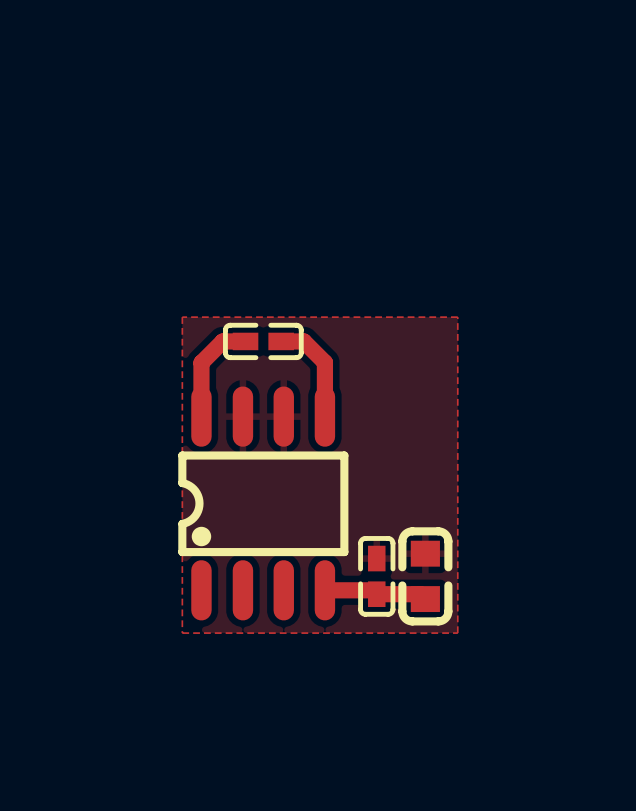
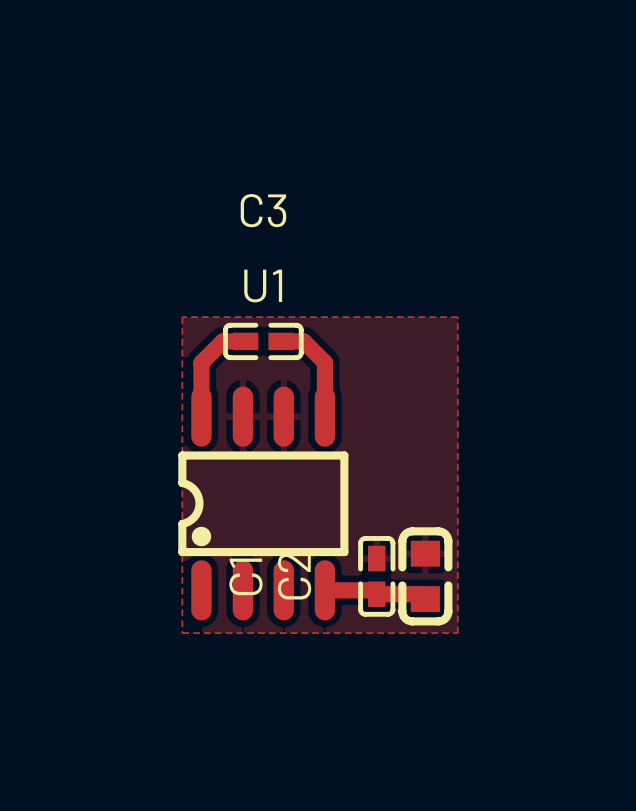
C3 name: none -> C3 (263, 210)
U1 name: none -> U1 (263, 285)
C1 name: none -> C1 (245, 576)
C2 name: none -> C2 (294, 576)

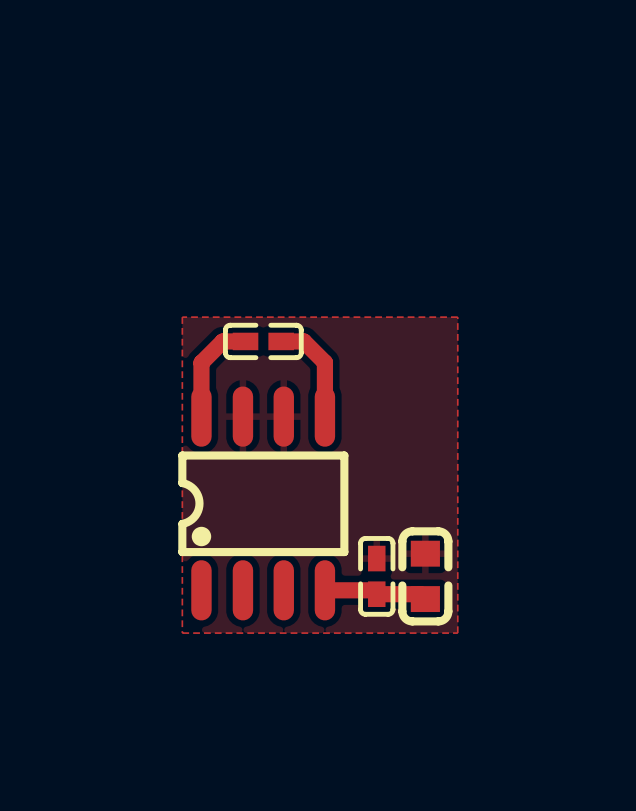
C3 name: C3 (263, 210) -> none
U1 name: U1 (263, 285) -> none
C1 name: C1 (245, 576) -> none
C2 name: C2 (294, 576) -> none

